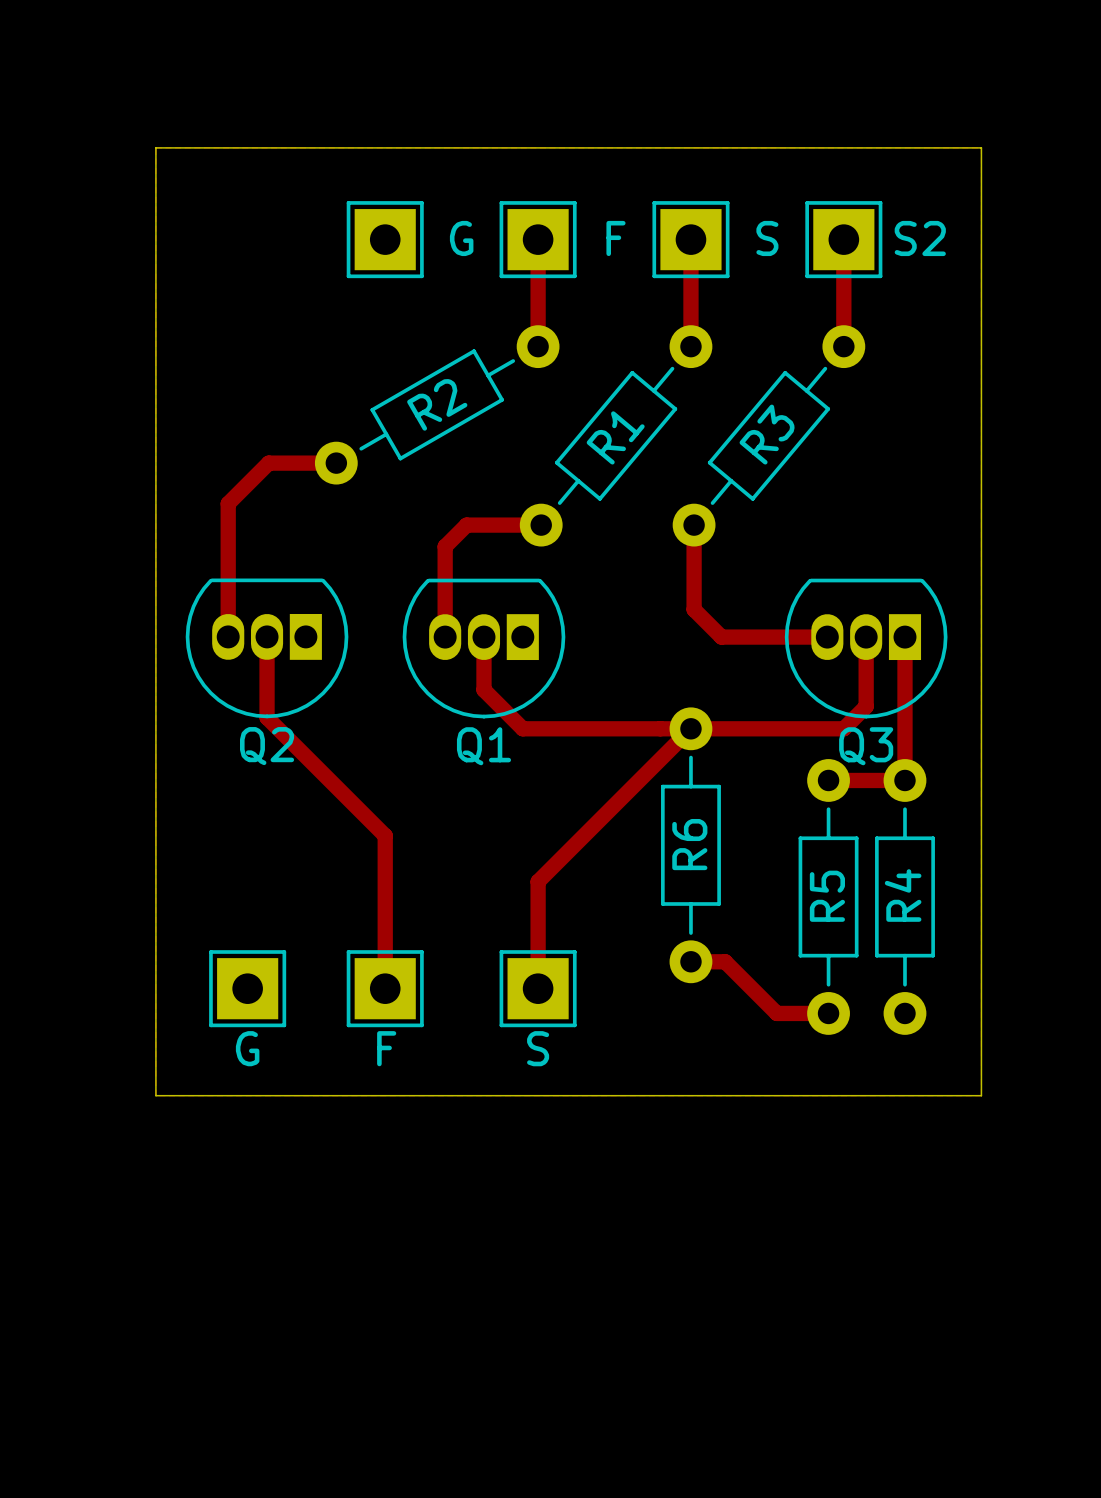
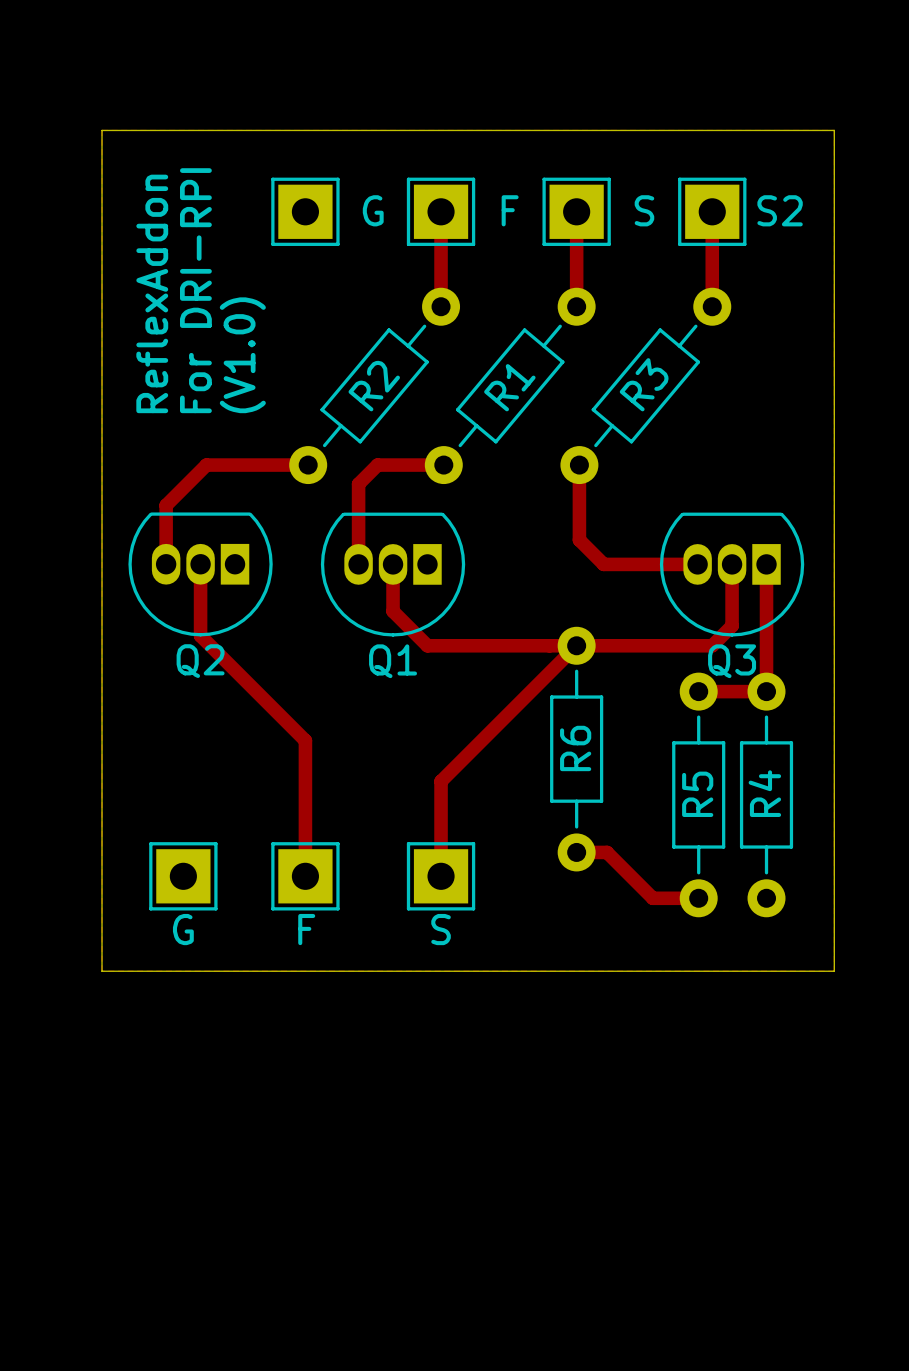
text: none -> For DRI-RPI (195, 290)
text: none -> ReflexAddon (152, 293)
text: none -> (V1.0) (242, 355)
R2 rotation: 0° (437, 404) -> 20° counterclockwise (374, 385)
track: (336, 463) (268, 463) (228, 503) (228, 570) -> (308, 465) (206, 465) (166, 505)

